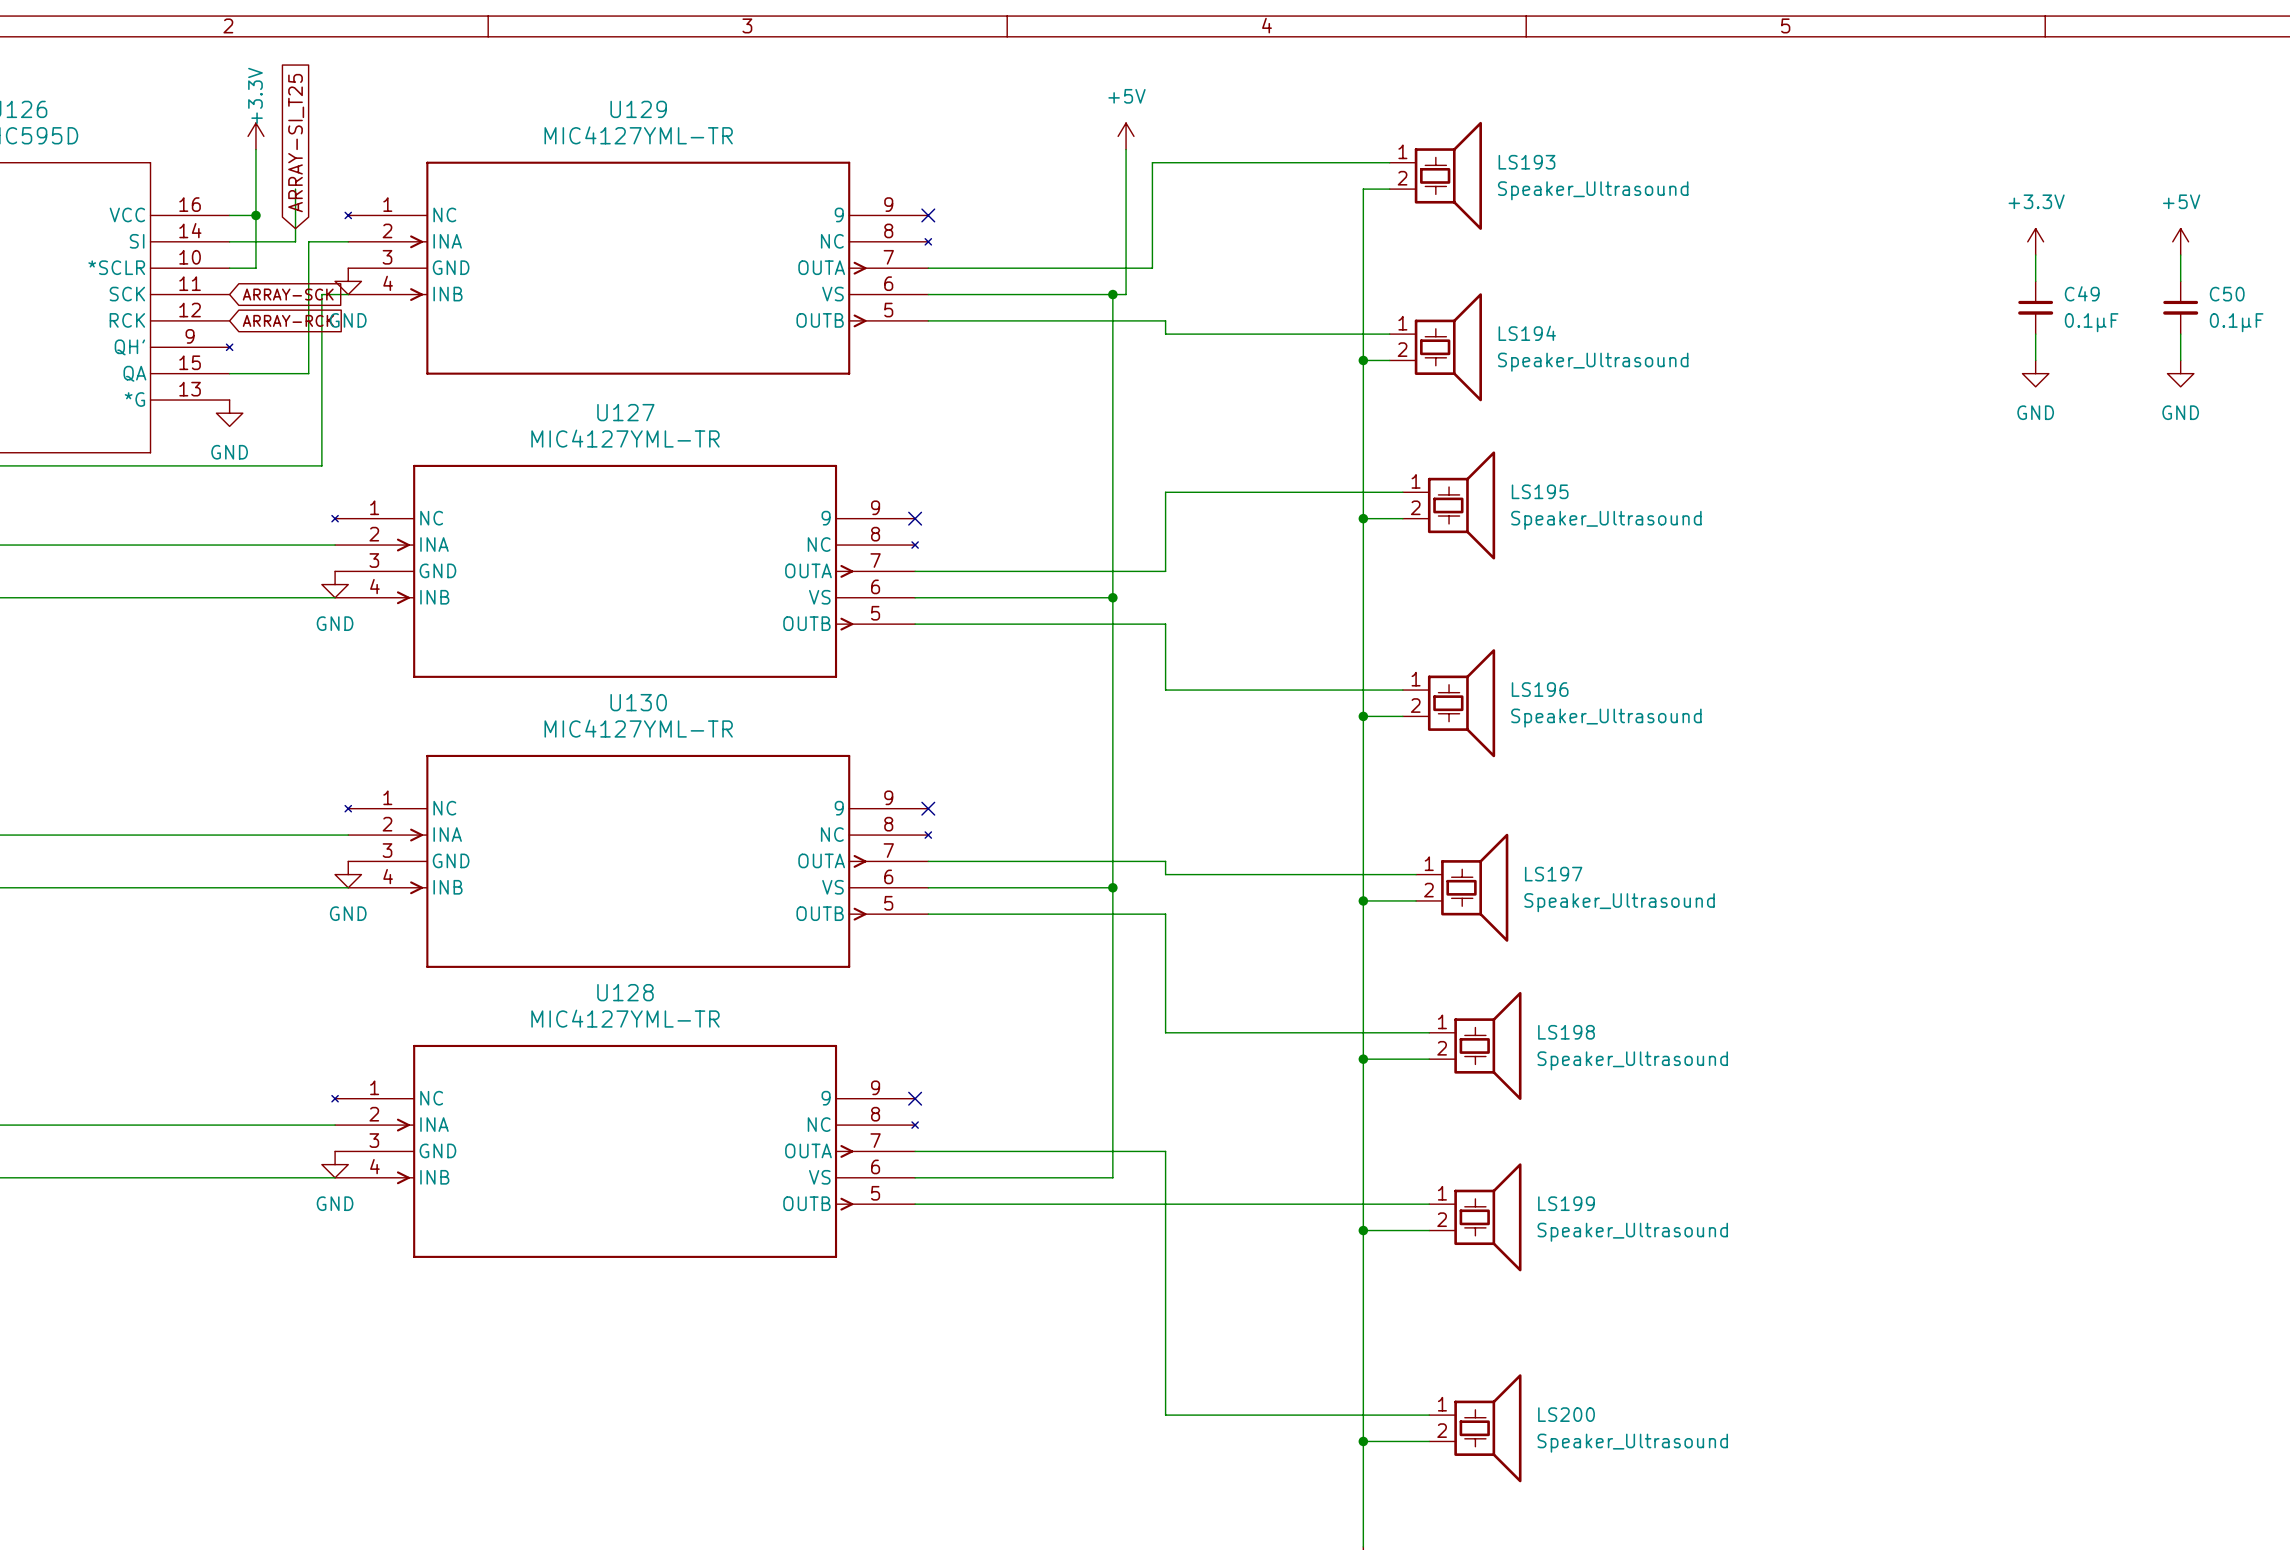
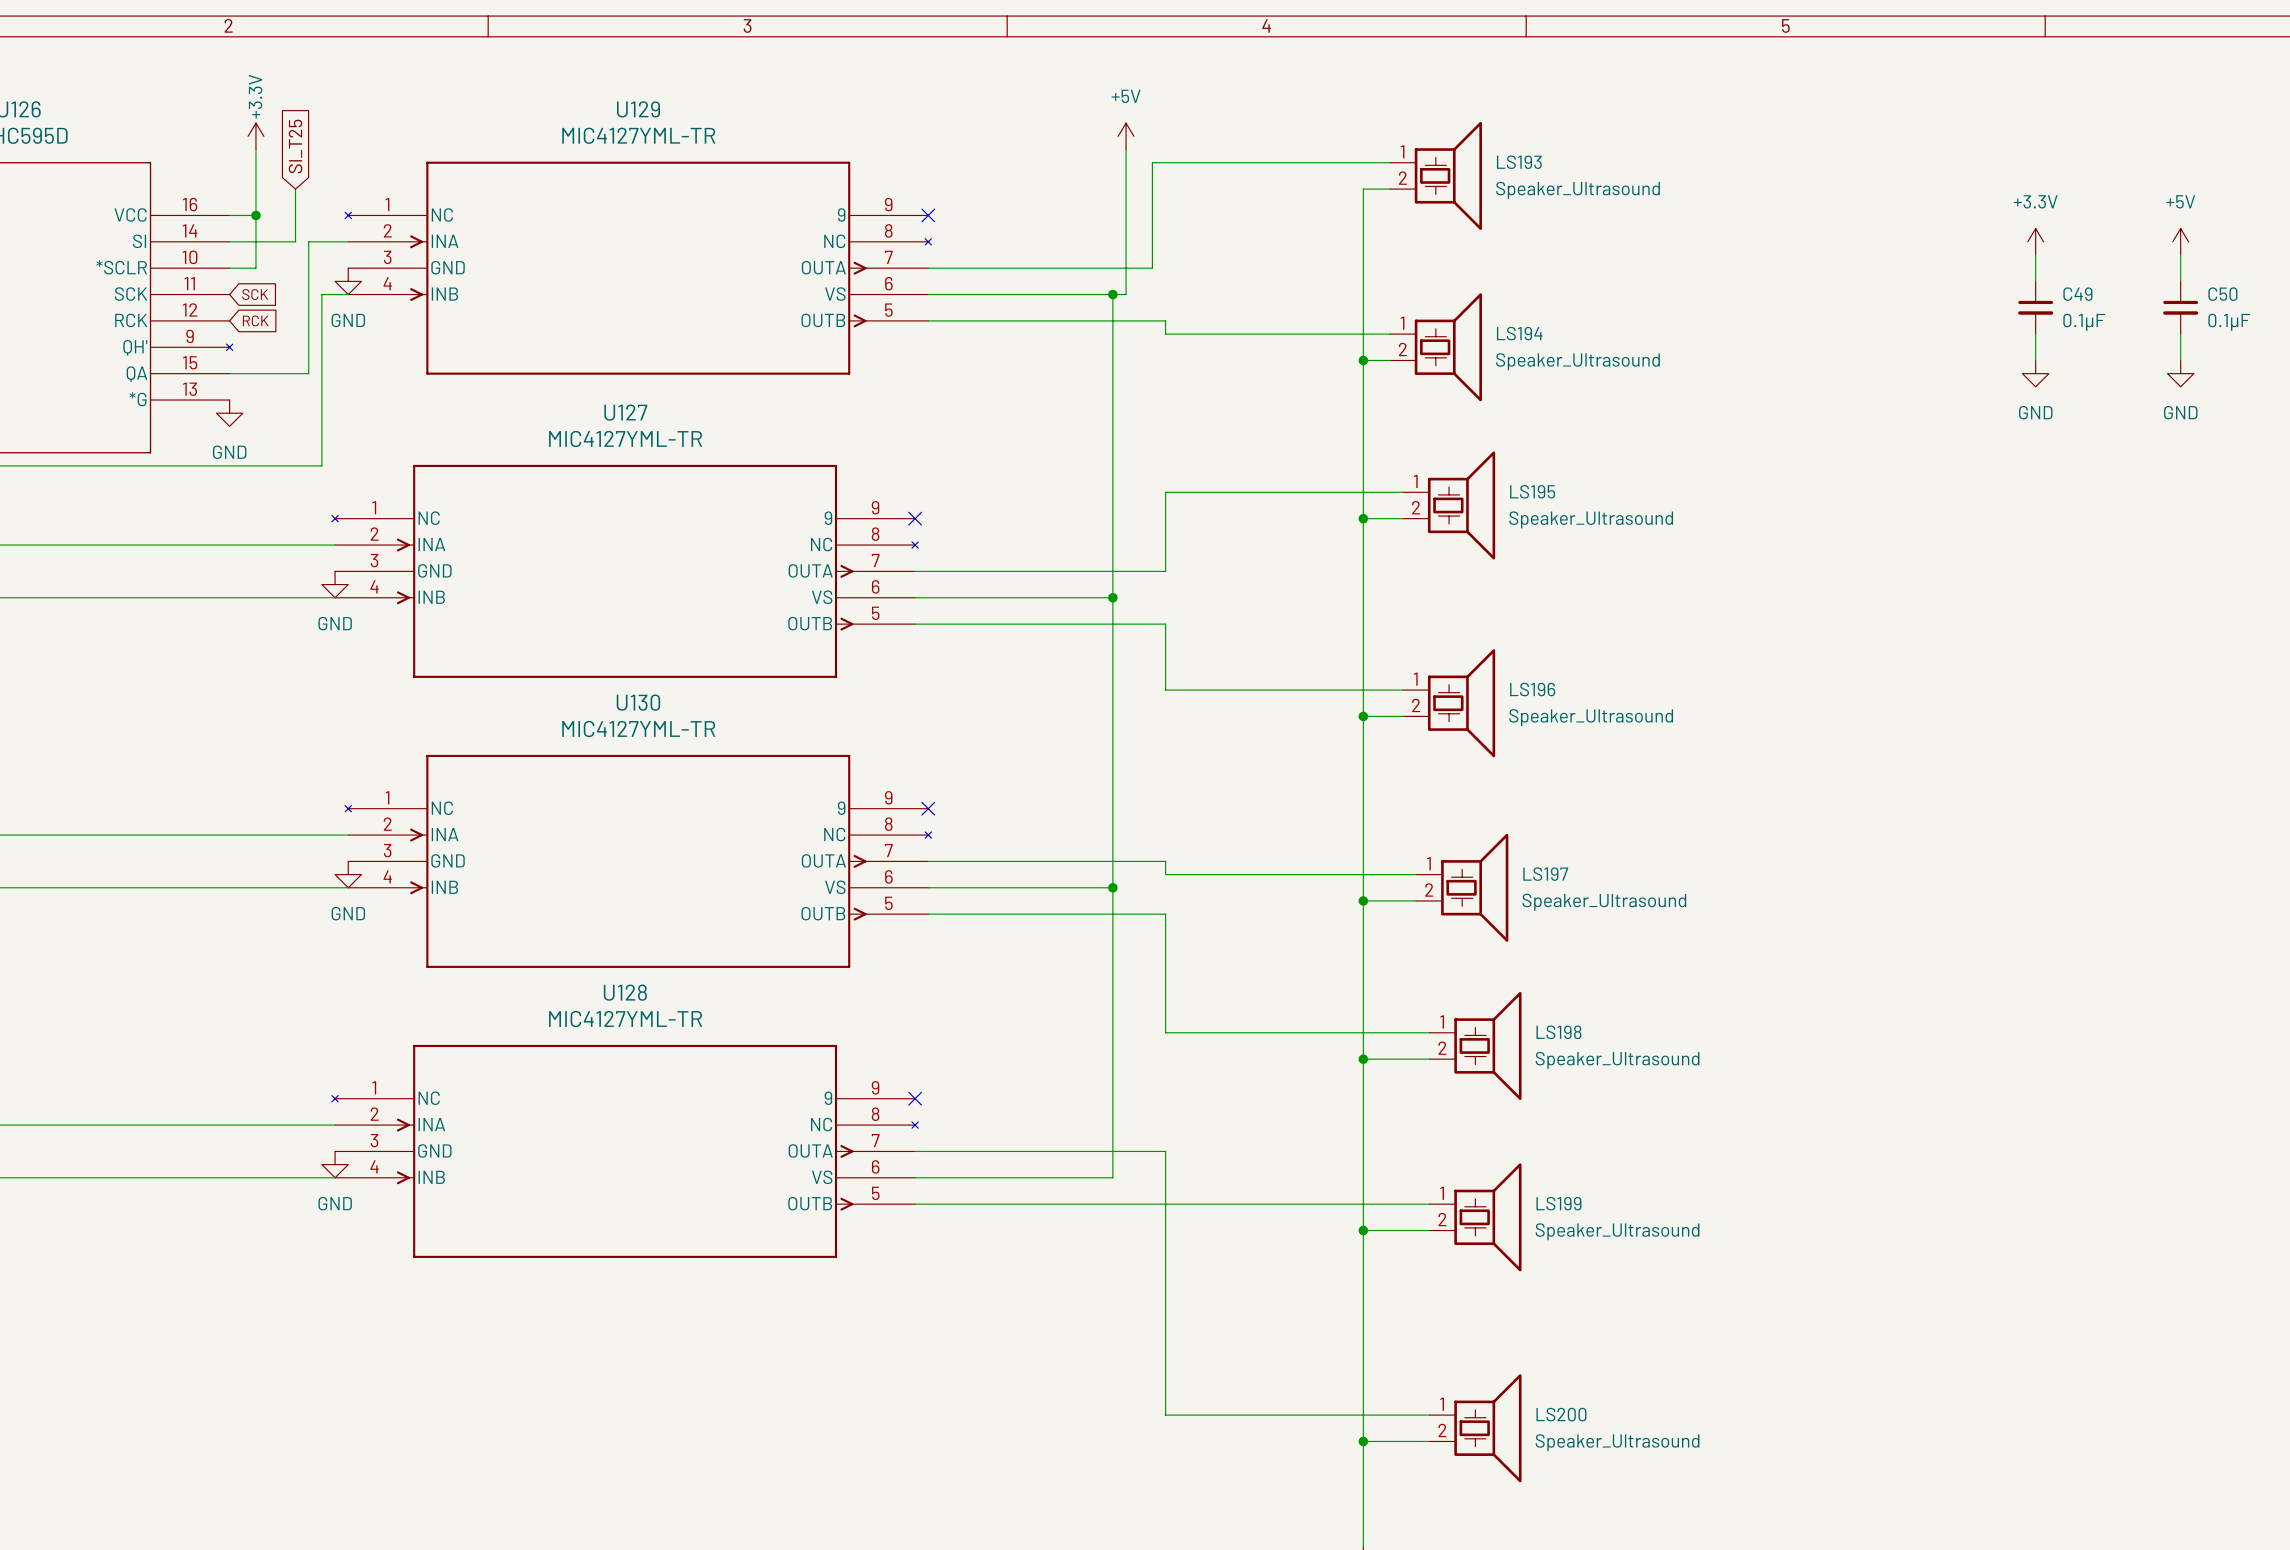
global label: ARRAY-SI_T25 (296, 143) -> SI_T25 (295, 146)
global label: ARRAY-SCK (288, 294) -> SCK (255, 294)
global label: ARRAY-RCK (288, 320) -> RCK (255, 320)

